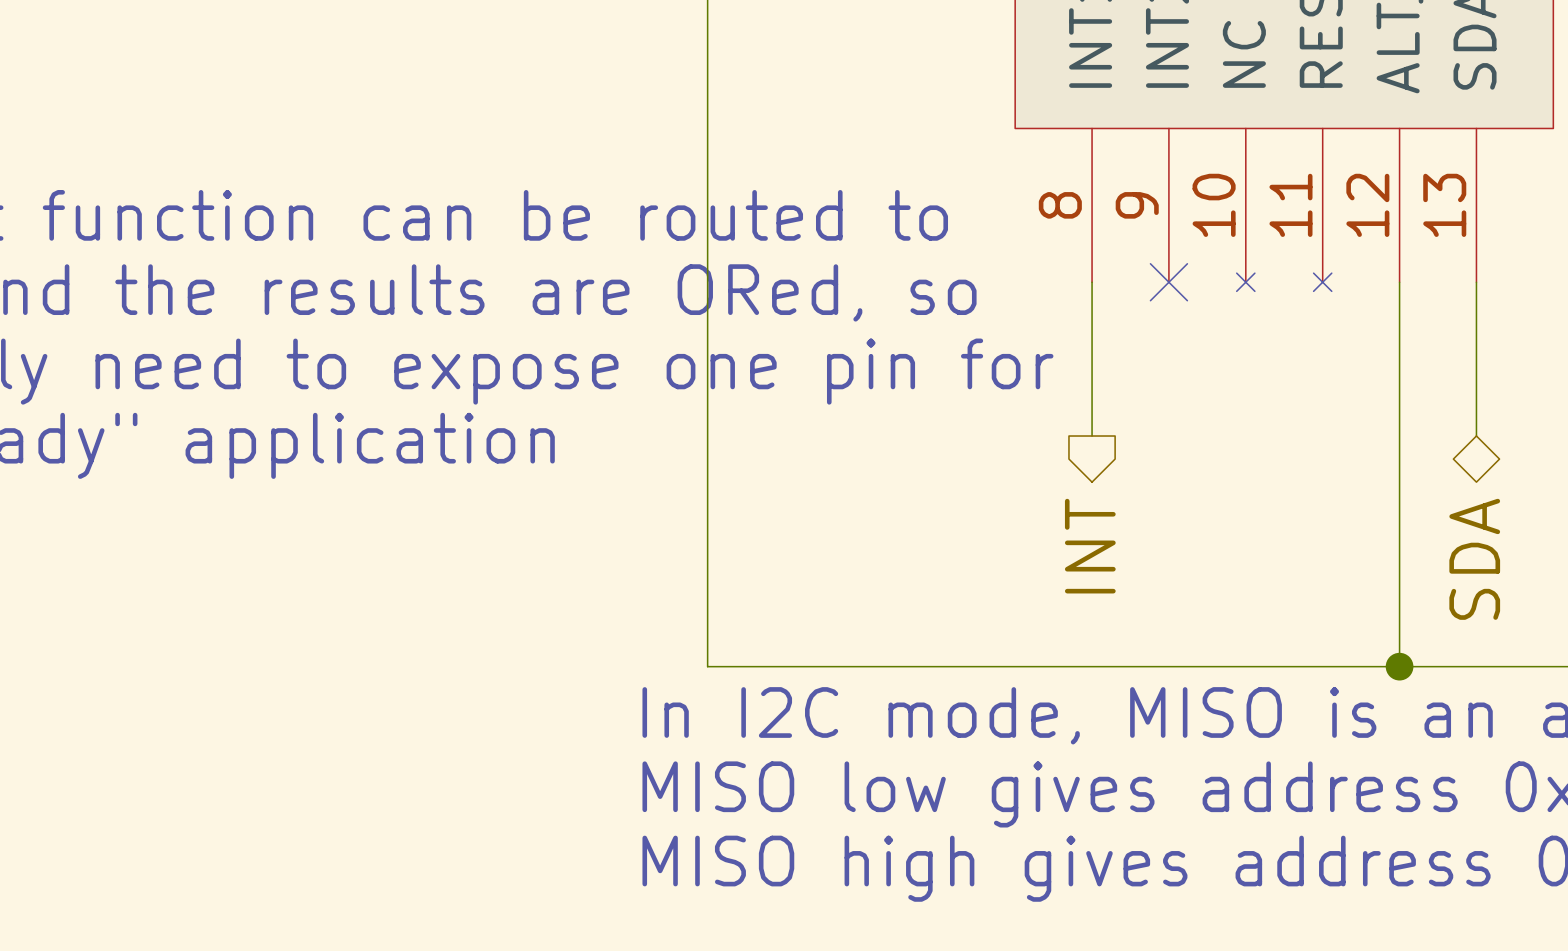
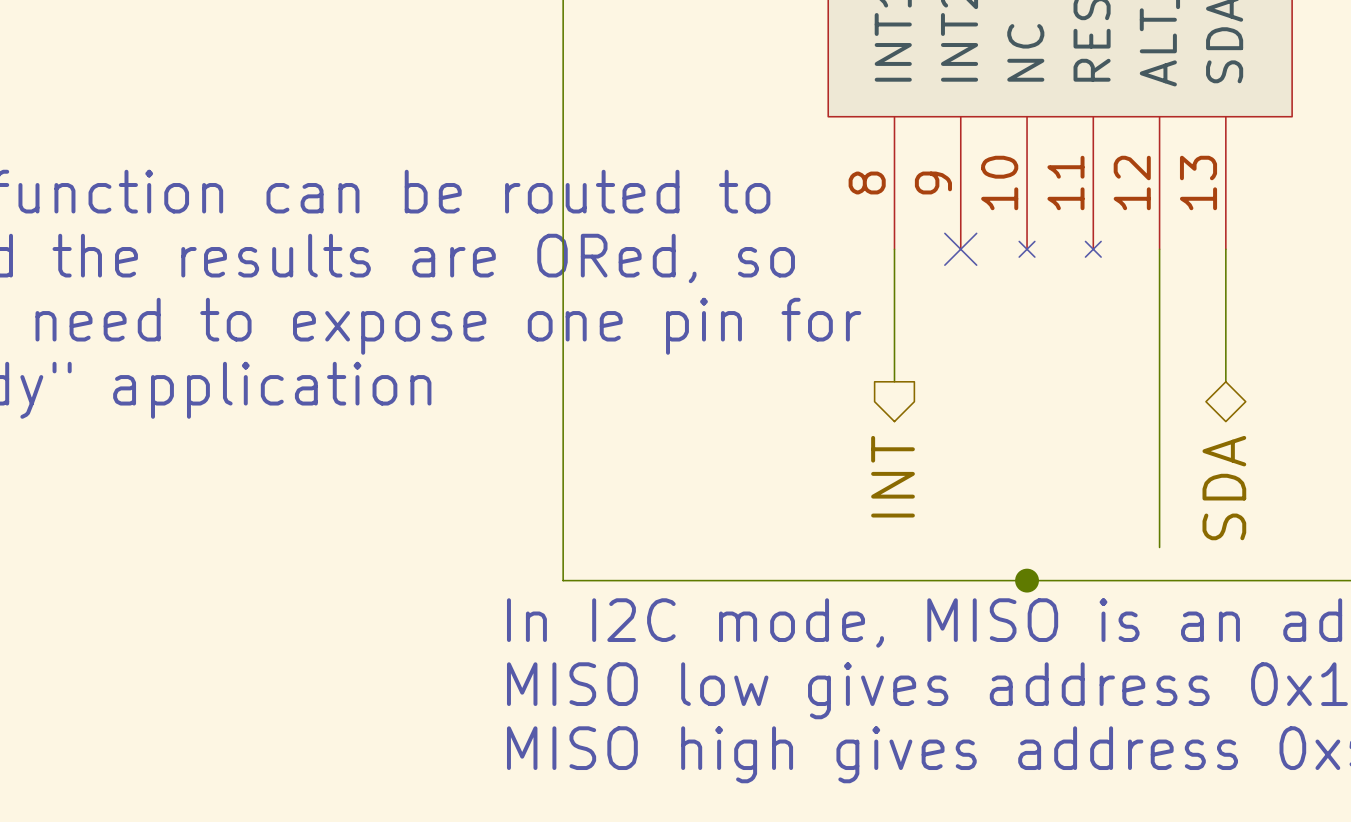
wire: (1399, 628) (1399, 666) -> none
junction position: (1399, 666) -> (1027, 580)

